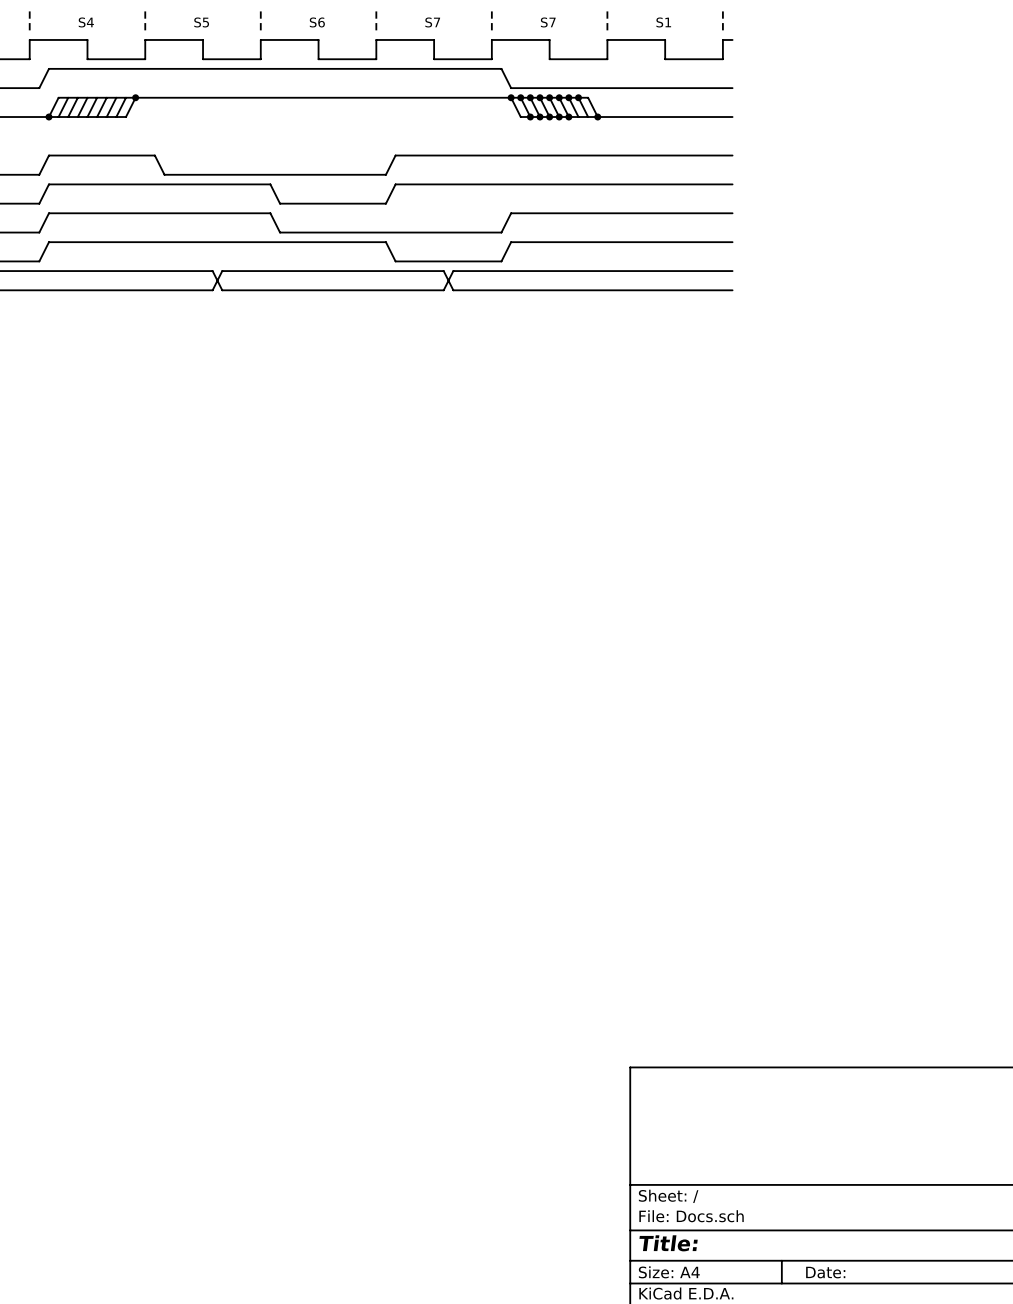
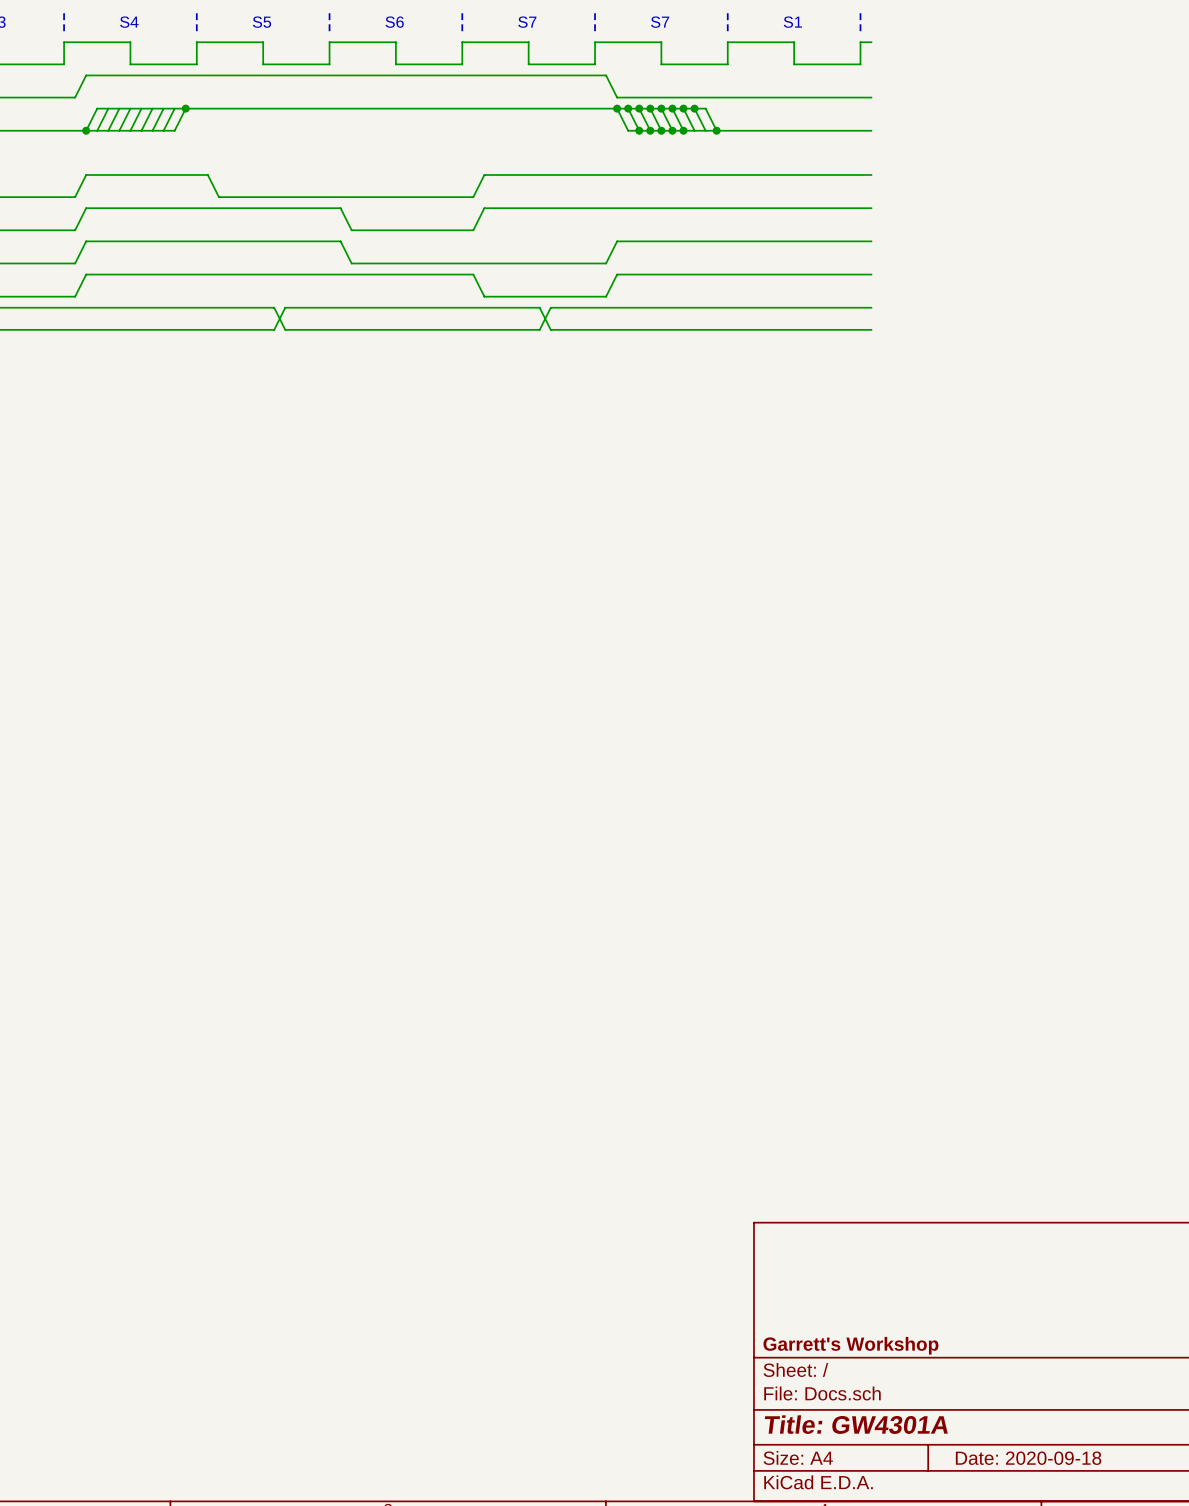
title block: none -> Garrett's Workshop (850, 1345)
title block: Title: (668, 1243) -> Title: GW4301A (856, 1424)
title block: Date: (825, 1272) -> Date: 2020-09-18 (1028, 1458)

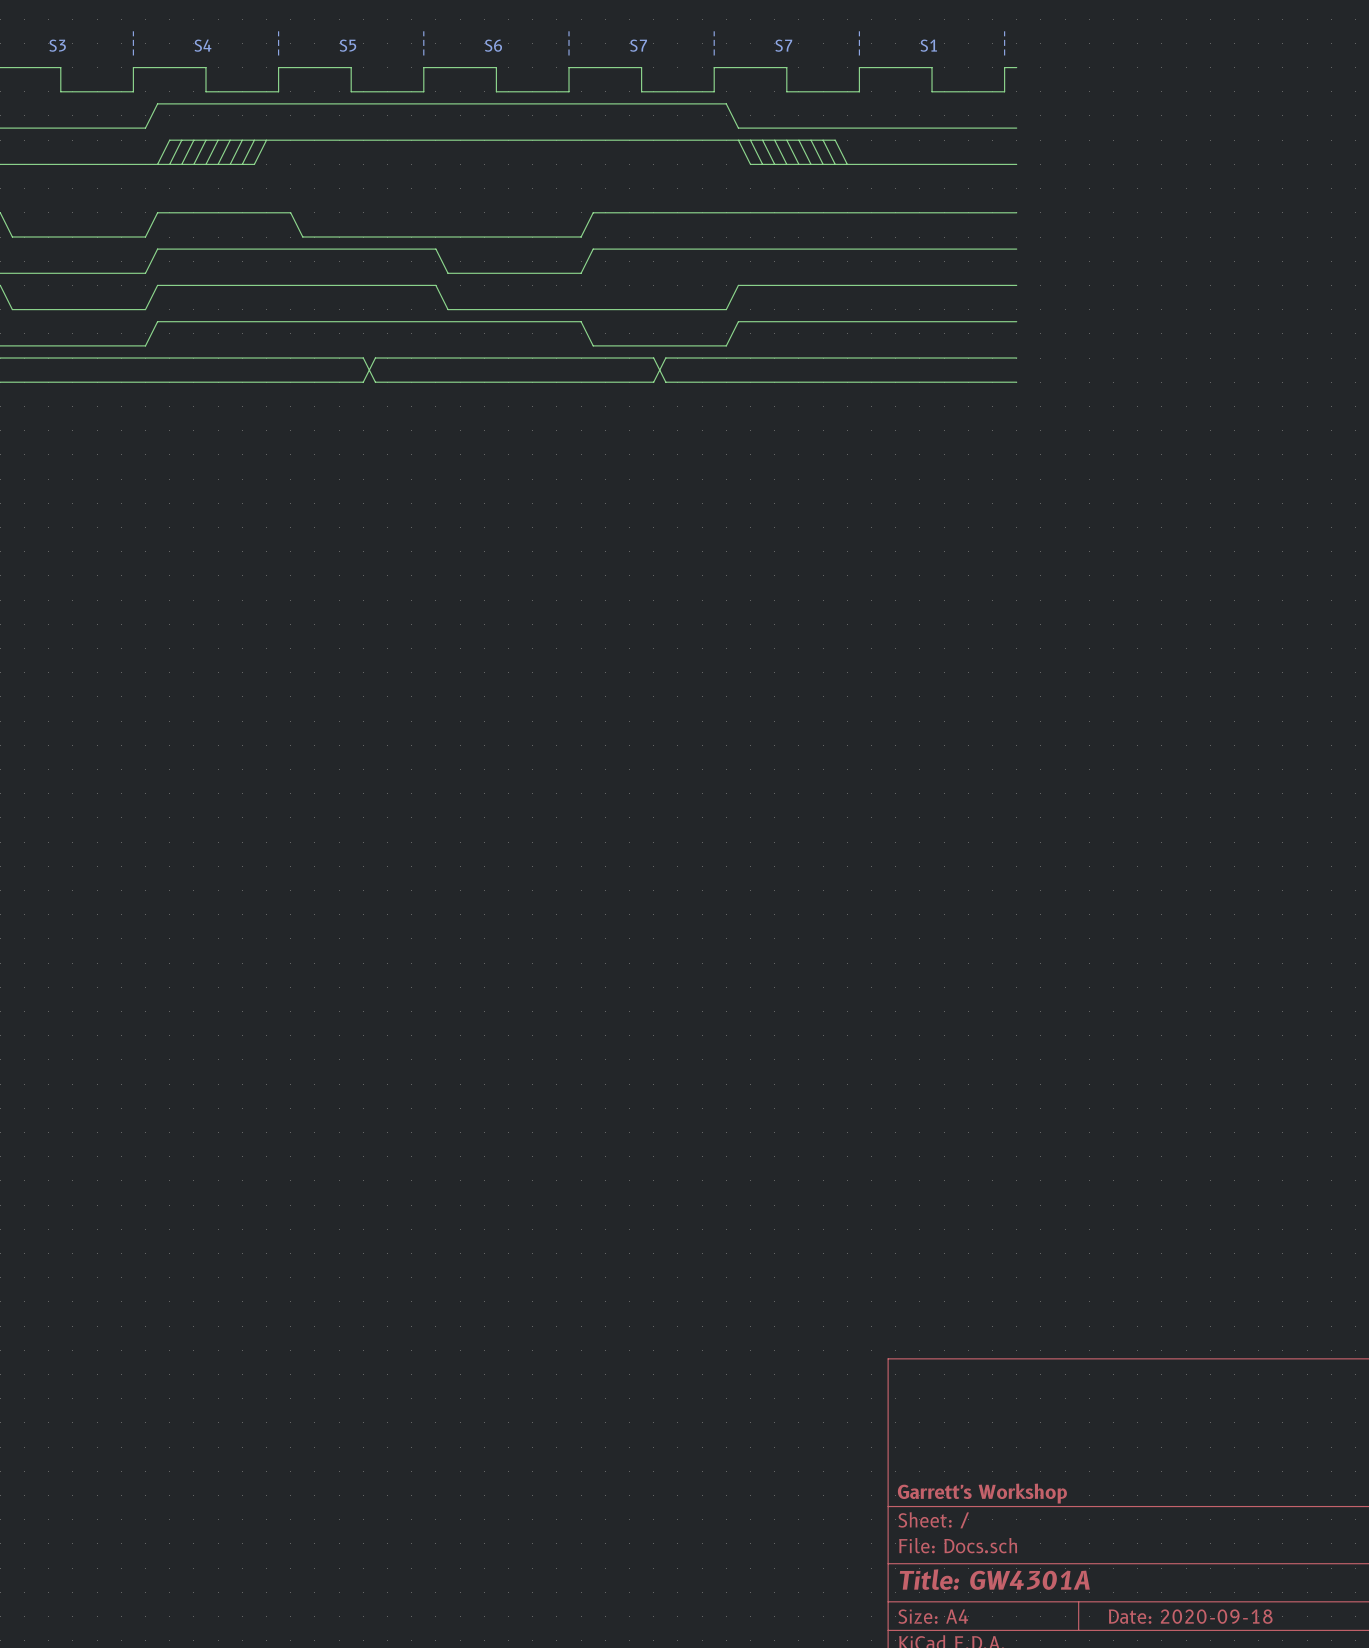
junction: (185, 108) -> none
junction: (617, 108) -> none
junction: (628, 108) -> none
junction: (639, 108) -> none
junction: (650, 108) -> none
junction: (661, 108) -> none
junction: (672, 108) -> none
junction: (683, 108) -> none
junction: (694, 108) -> none
junction: (86, 130) -> none
junction: (639, 130) -> none
junction: (650, 130) -> none
junction: (661, 130) -> none
junction: (672, 130) -> none
junction: (683, 130) -> none
junction: (716, 130) -> none

